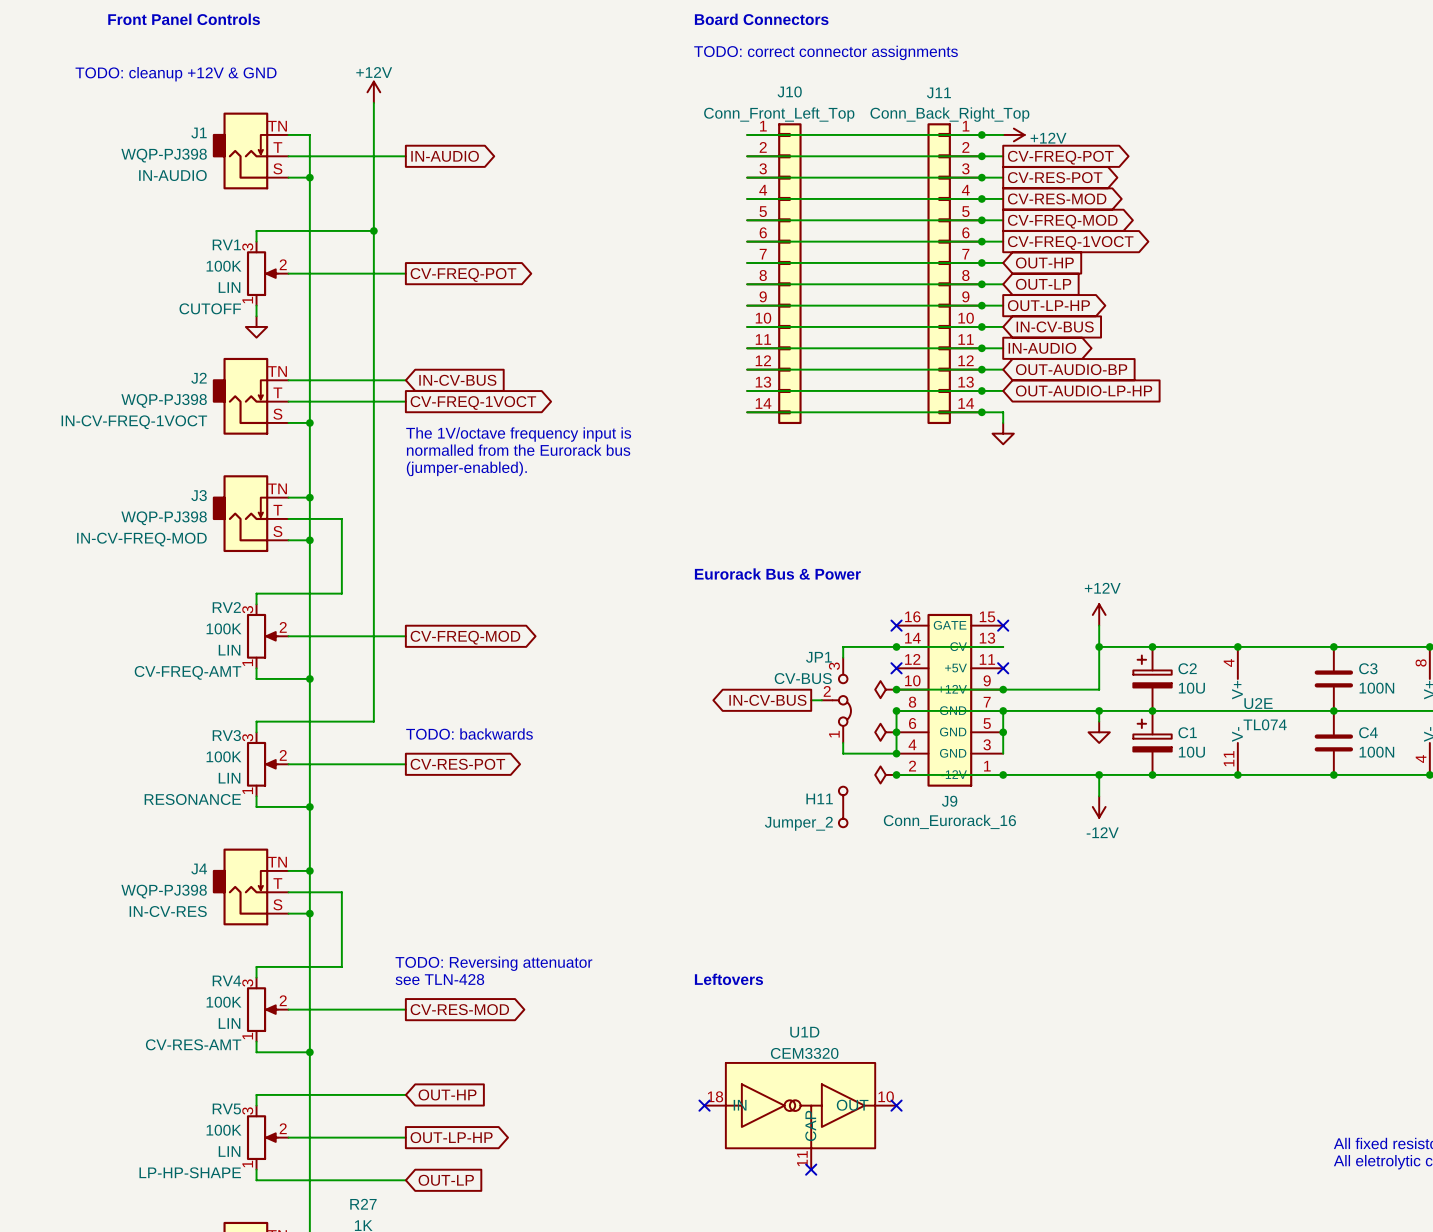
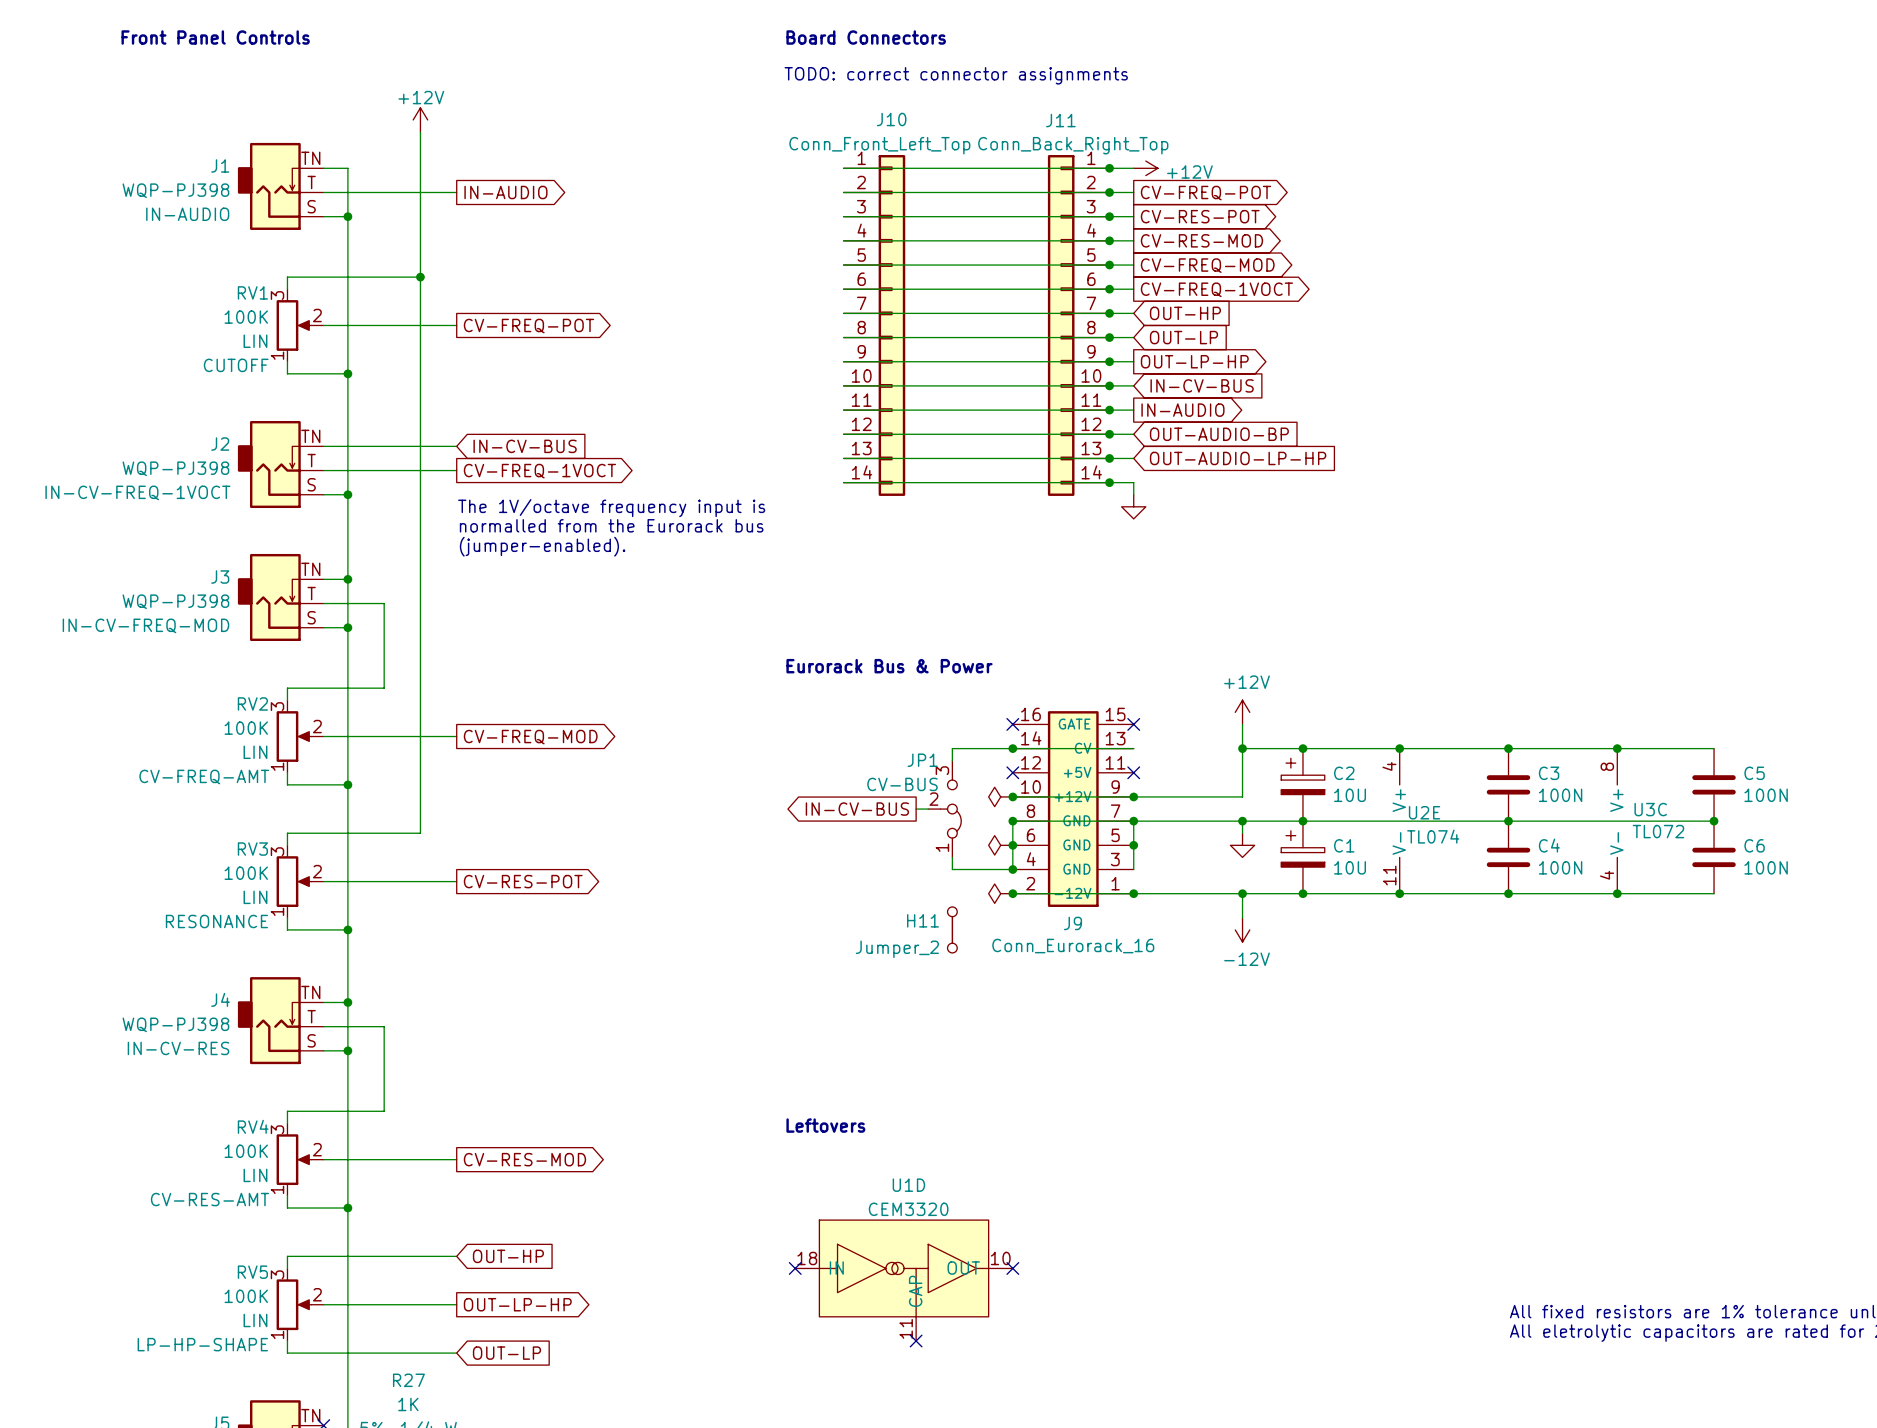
text: TODO: cleanup +12V & GND (176, 74) -> none
wire: none -> (287, 373) (347, 373)
junction: none -> (347, 373)
power symbol: (256, 326) -> none
text: TODO: backwards (469, 734) -> none
text: TODO: Reversing attenuator (493, 963) -> none
text: see TLN-428 (439, 979) -> none

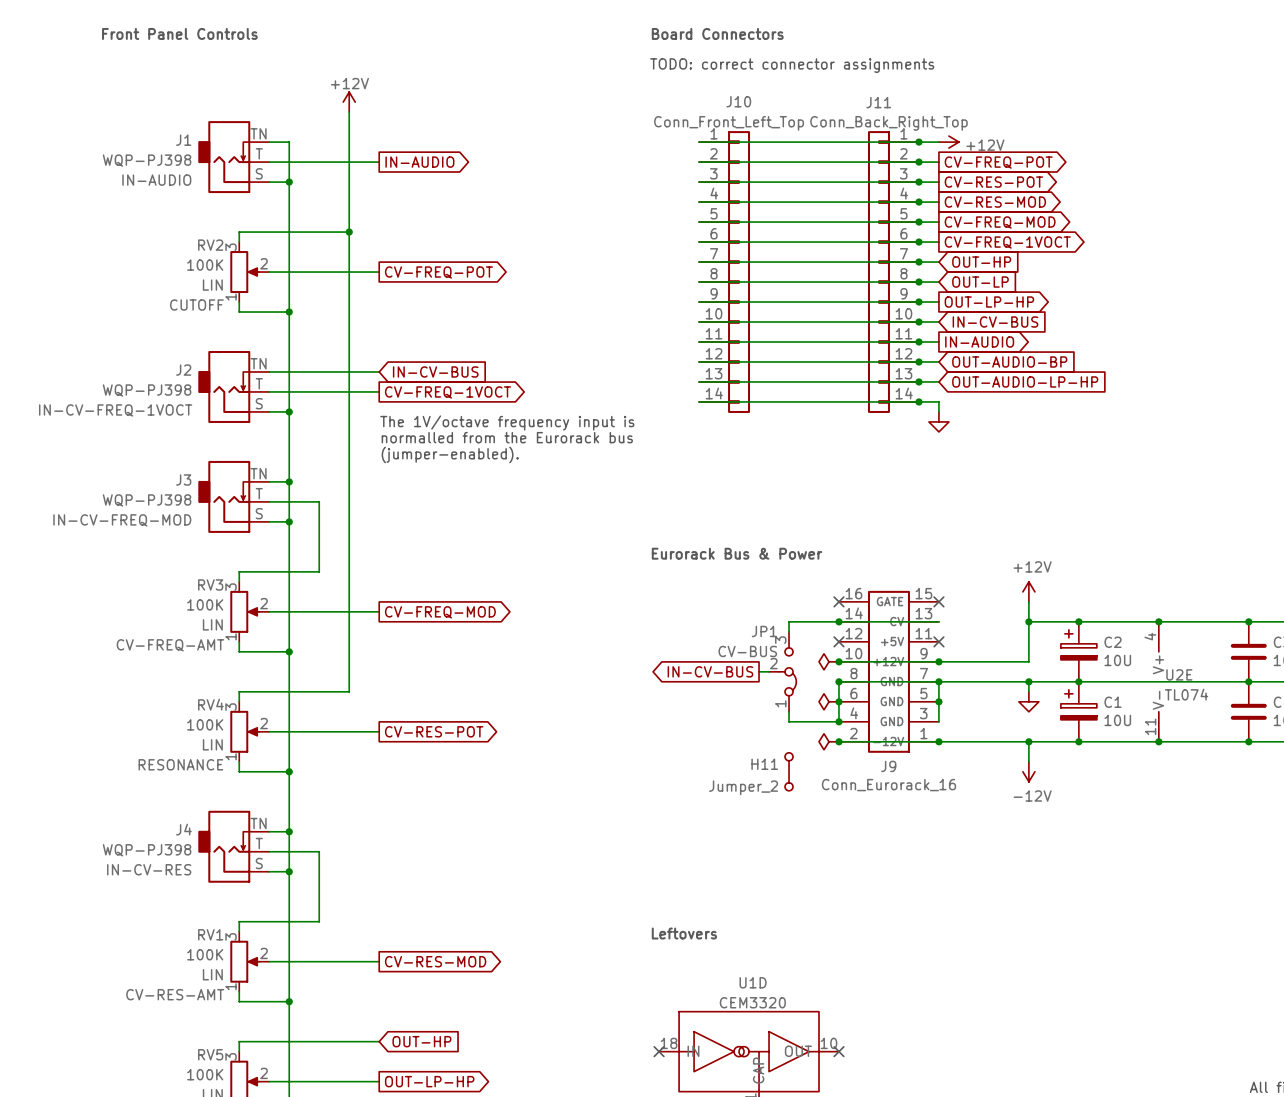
RV1 name: RV1 (252, 292) -> RV2 (210, 245)
RV2 name: RV2 (252, 703) -> RV3 (210, 584)
RV3 name: RV3 (252, 849) -> RV4 (210, 704)
RV4 name: RV4 (253, 1126) -> RV1 (210, 934)

